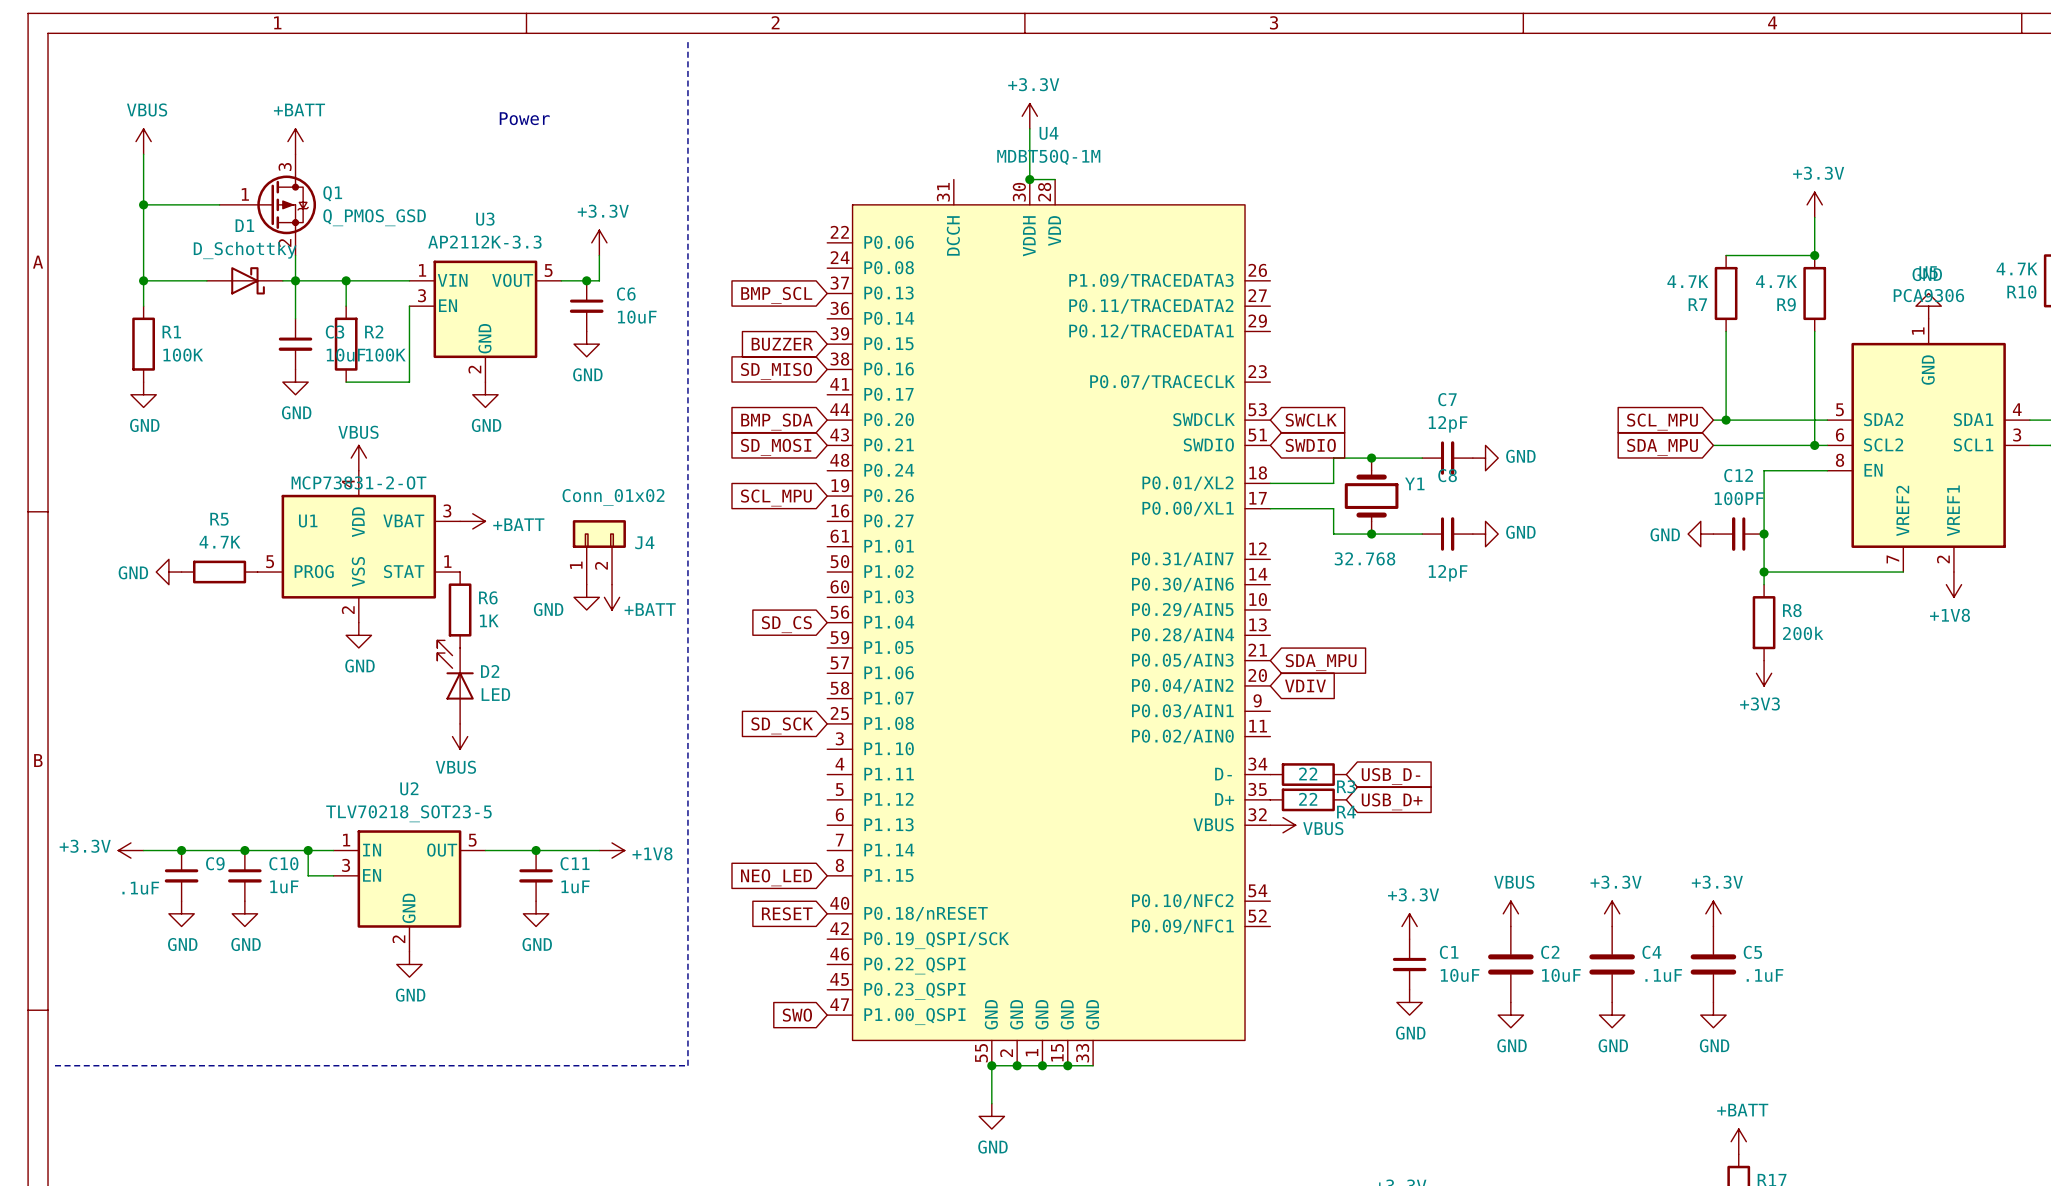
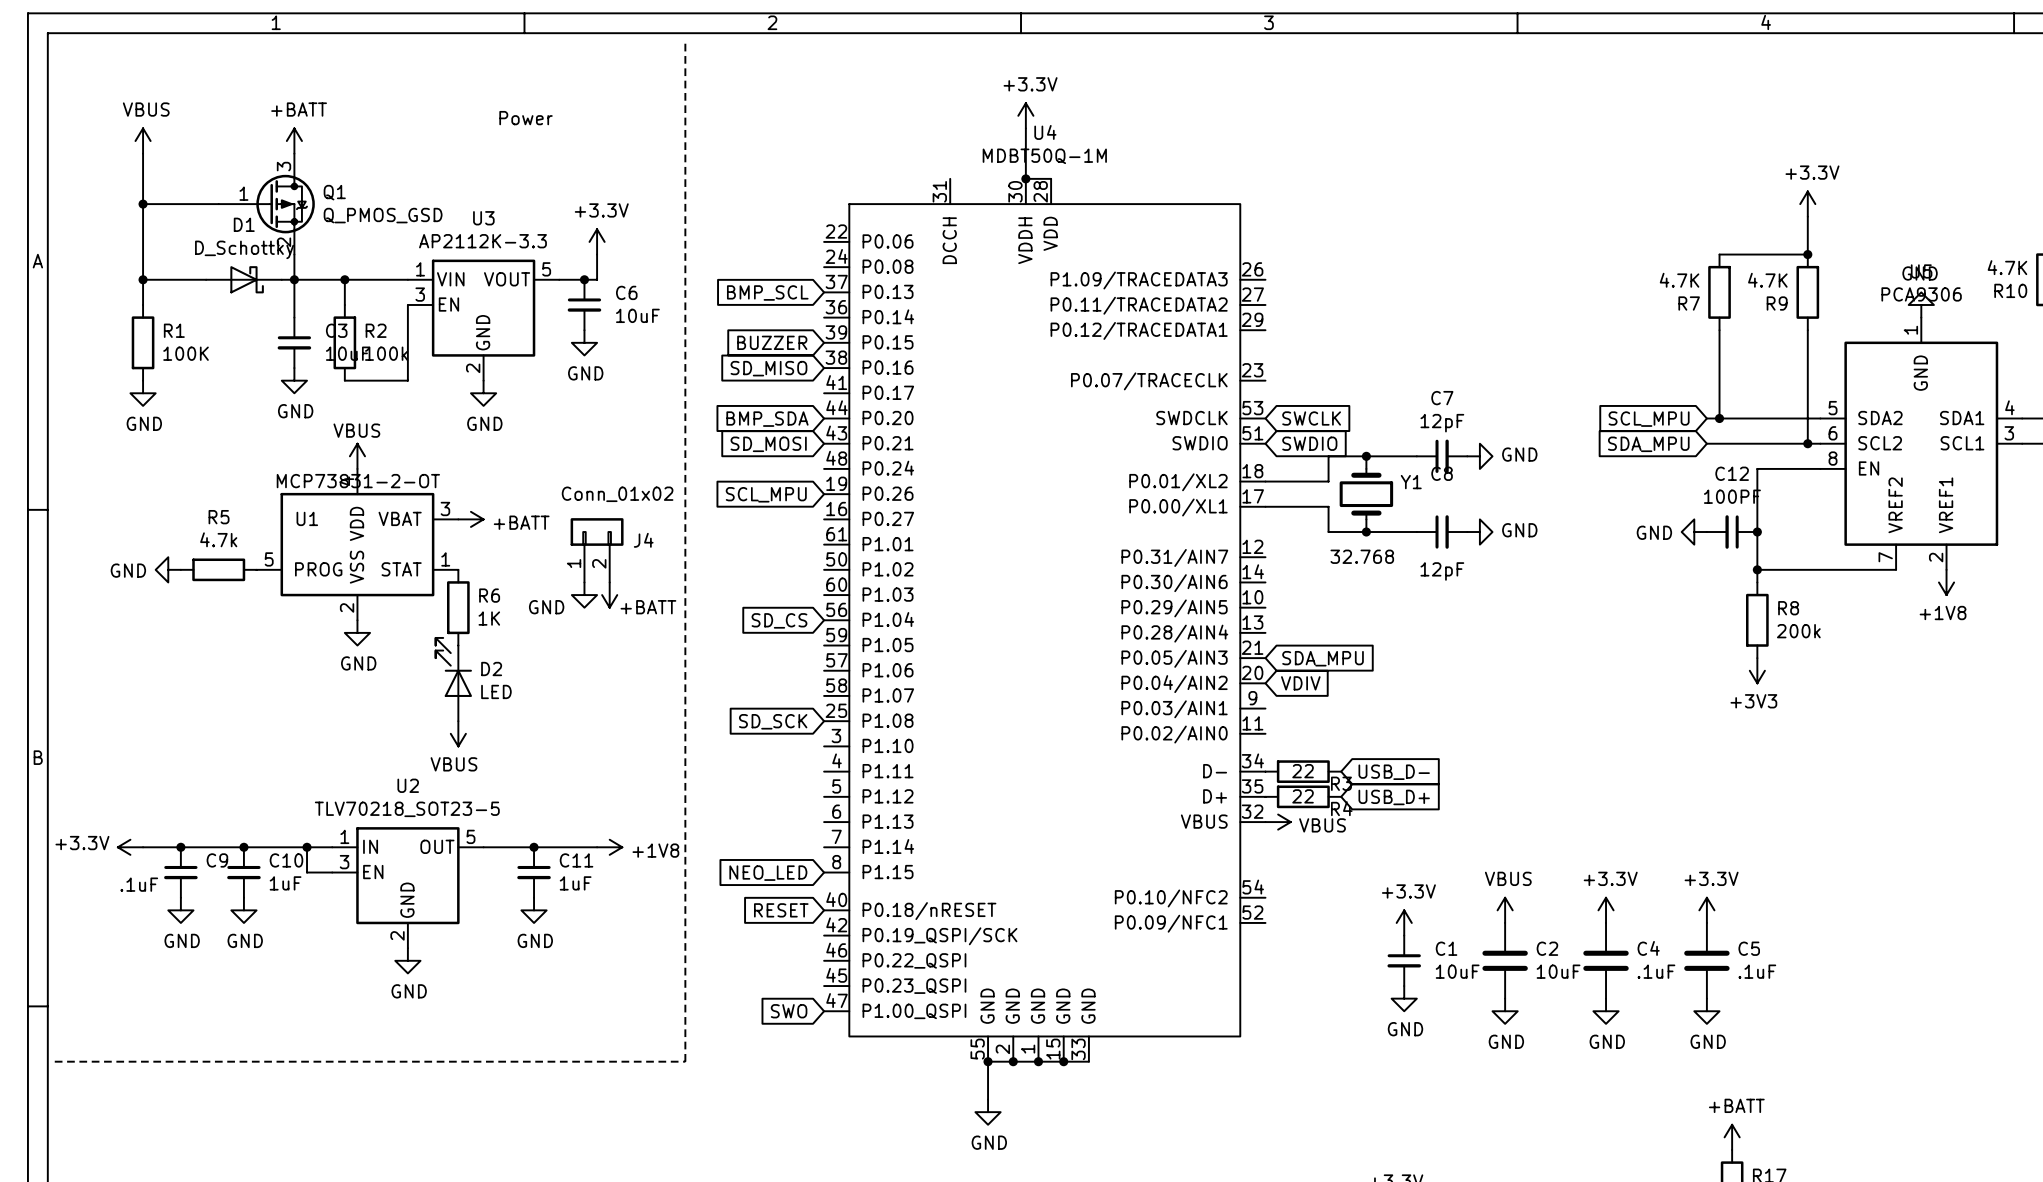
R2 value: 100K (385, 355) -> 100k (386, 353)
R5 value: 4.7K (219, 542) -> 4.7k (218, 539)

